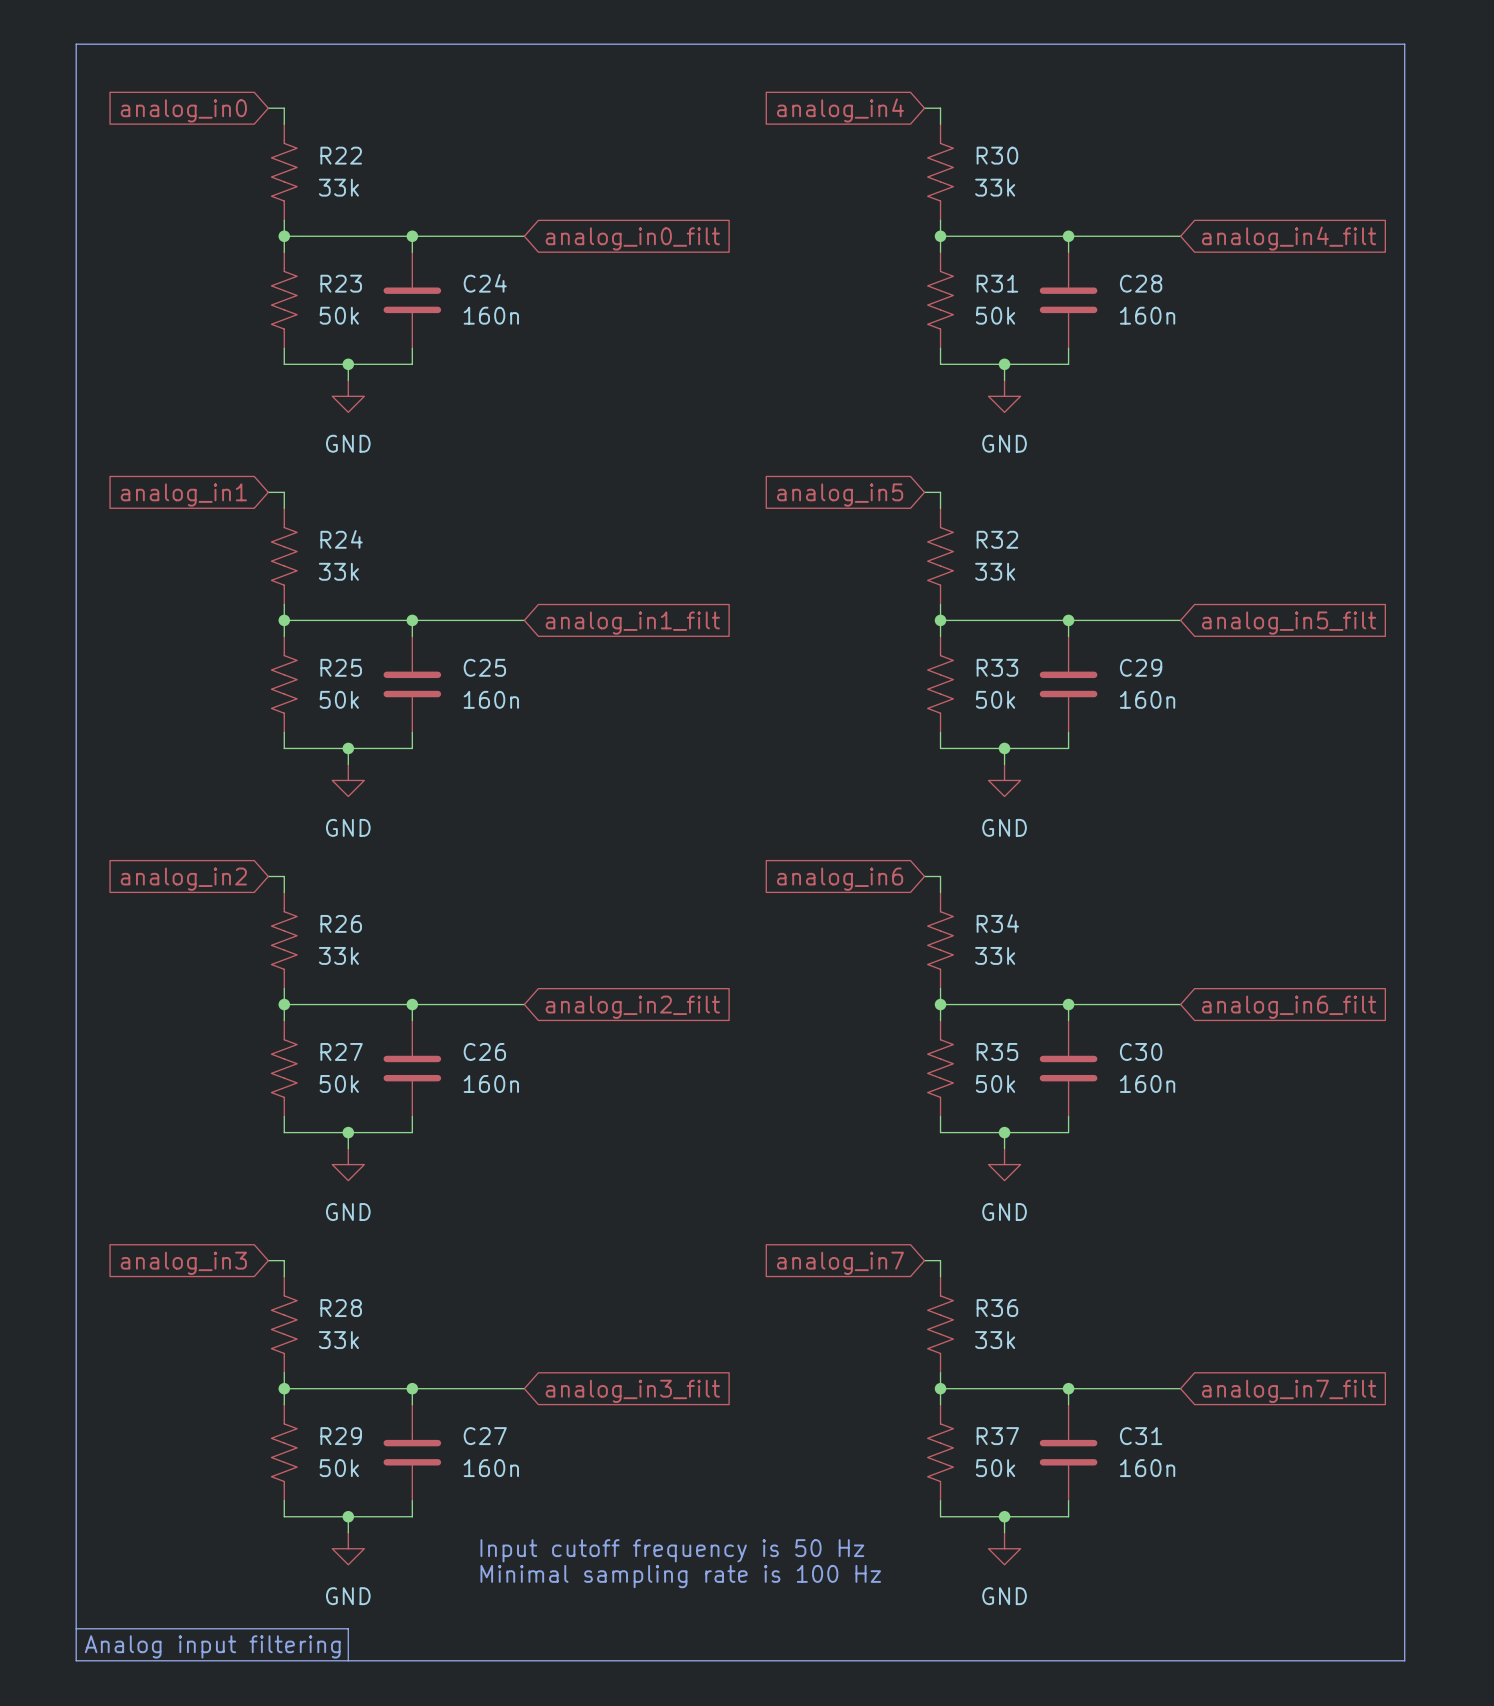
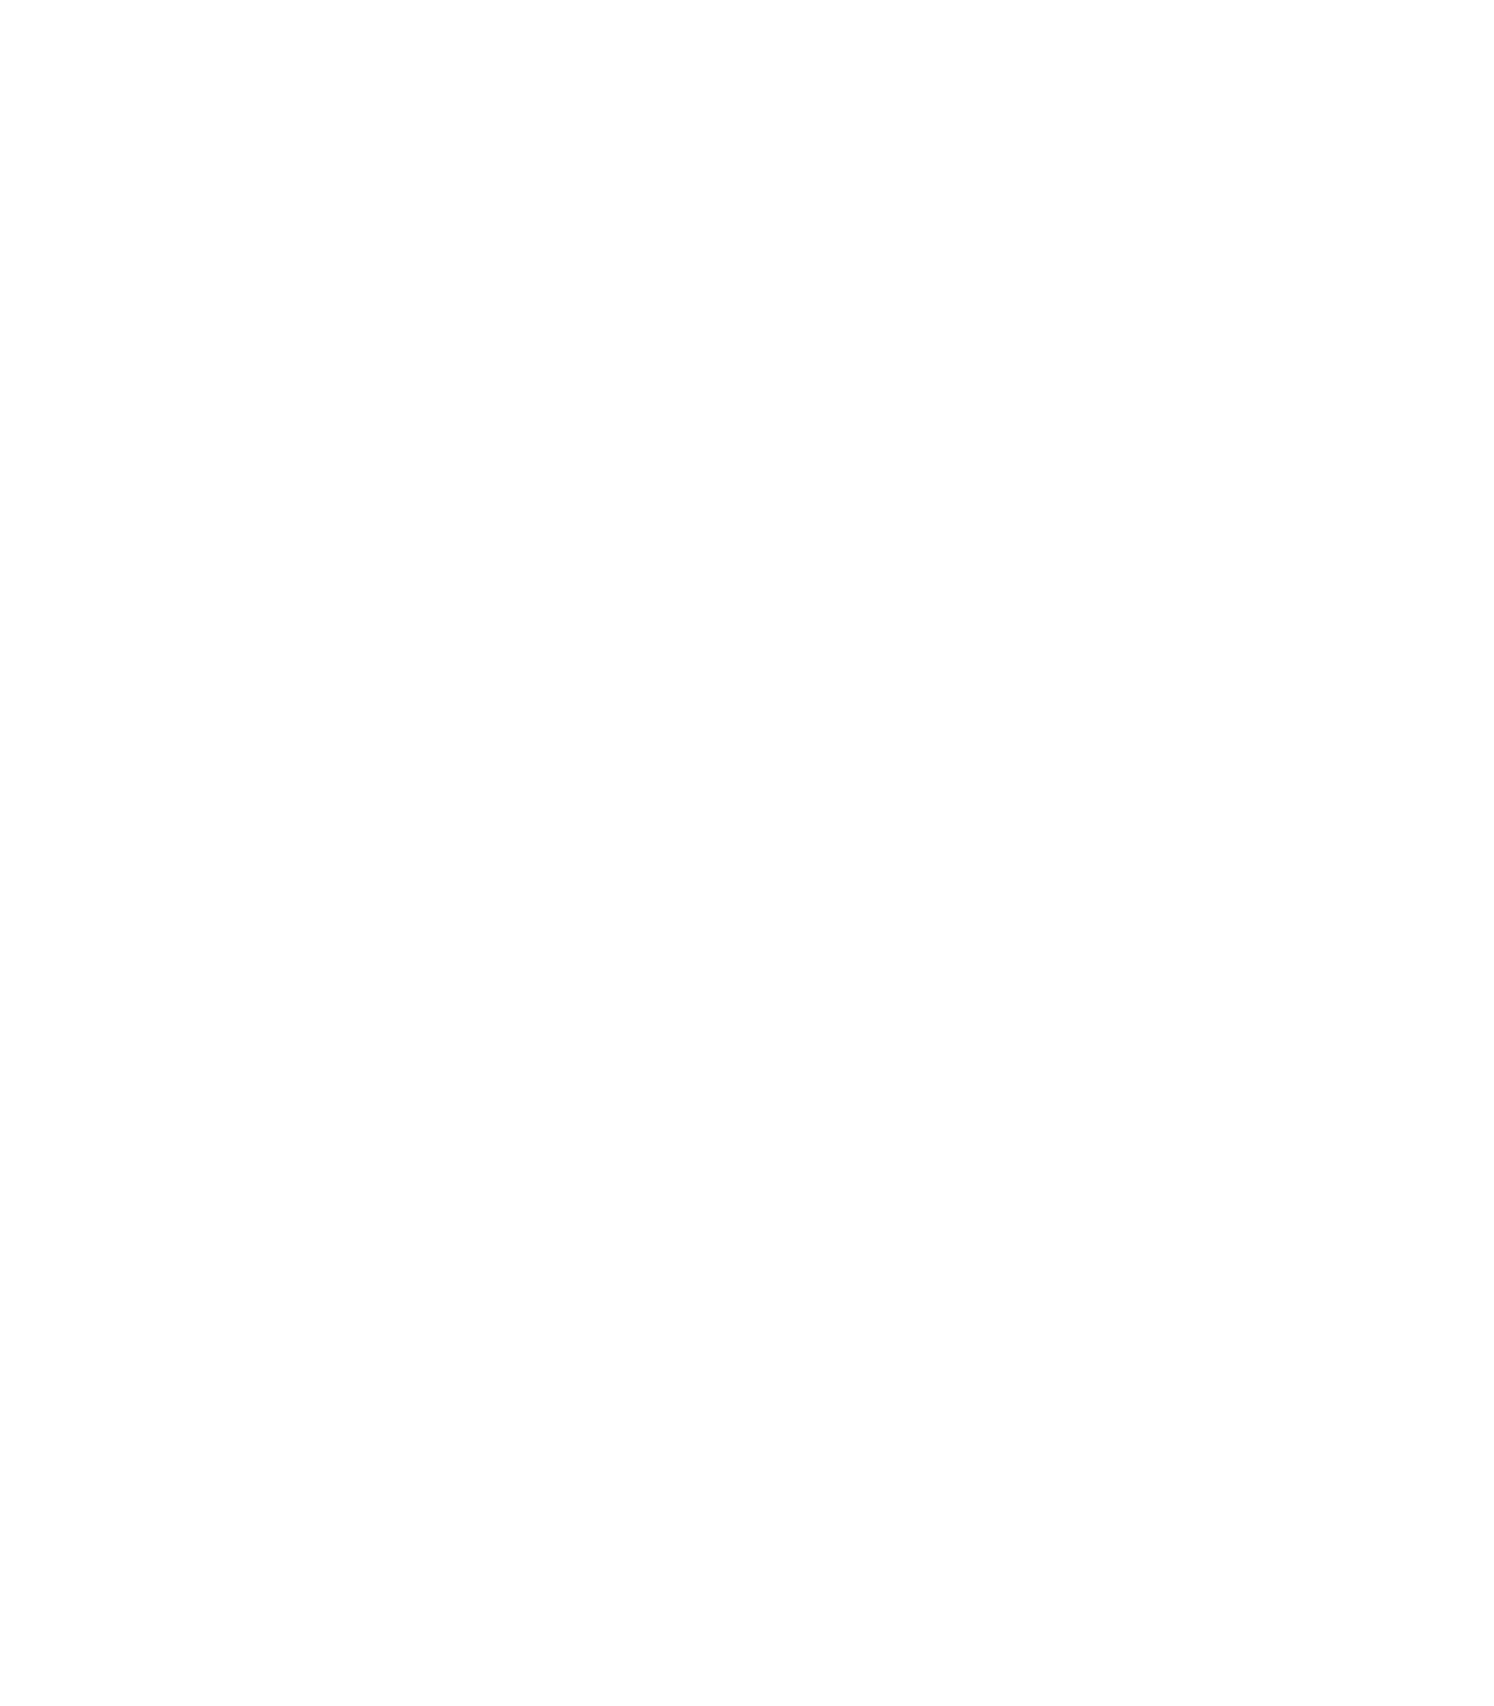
line: (76, 44) (1404, 44) (1404, 1660) (76, 1660) (76, 44) -> none
wire: (268, 108) (284, 108) (284, 124) -> none
wire: (924, 108) (940, 108) (940, 124) -> none
global label: analog_in0 (183, 110) -> none
global label: analog_in4 (840, 110) -> none
R22: 33k (284, 172) -> none
R30: 33k (940, 172) -> none
wire: (284, 220) (284, 252) -> none
wire: (940, 220) (940, 252) -> none
wire: (284, 236) (524, 236) -> none
junction: (284, 236) -> none
wire: (412, 236) (412, 252) -> none
junction: (412, 236) -> none
wire: (940, 236) (1180, 236) -> none
junction: (940, 236) -> none
wire: (1068, 236) (1068, 252) -> none
junction: (1068, 236) -> none
global label: analog_in0_filt (632, 238) -> none
global label: analog_in4_filt (1289, 238) -> none
R23: 50k (284, 300) -> none
C24: 160n (412, 300) -> none
R31: 50k (940, 300) -> none
C28: 160n (1068, 300) -> none
wire: (284, 348) (284, 364) (412, 364) (412, 348) -> none
wire: (940, 348) (940, 364) (1068, 364) (1068, 348) -> none
wire: (348, 364) (348, 380) -> none
junction: (348, 364) -> none
wire: (1004, 364) (1004, 380) -> none
junction: (1004, 364) -> none
power symbol: GND (348, 396) -> none
power symbol: GND (1004, 396) -> none
wire: (268, 492) (284, 492) (284, 508) -> none
wire: (924, 492) (940, 492) (940, 508) -> none
global label: analog_in1 (183, 495) -> none
global label: analog_in5 (840, 495) -> none
R24: 33k (284, 556) -> none
R32: 33k (940, 556) -> none
wire: (284, 604) (284, 636) -> none
wire: (940, 604) (940, 636) -> none
wire: (284, 620) (524, 620) -> none
junction: (284, 620) -> none
wire: (412, 620) (412, 636) -> none
junction: (412, 620) -> none
wire: (940, 620) (1180, 620) -> none
junction: (940, 620) -> none
wire: (1068, 620) (1068, 636) -> none
junction: (1068, 620) -> none
global label: analog_in1_filt (632, 623) -> none
global label: analog_in5_filt (1289, 623) -> none
R25: 50k (284, 684) -> none
C25: 160n (412, 684) -> none
R33: 50k (940, 684) -> none
C29: 160n (1068, 684) -> none
wire: (284, 732) (284, 748) (412, 748) (412, 732) -> none
wire: (940, 732) (940, 748) (1068, 748) (1068, 732) -> none
wire: (348, 748) (348, 764) -> none
junction: (348, 748) -> none
wire: (1004, 748) (1004, 764) -> none
junction: (1004, 748) -> none
power symbol: GND (348, 780) -> none
power symbol: GND (1004, 780) -> none
wire: (268, 876) (284, 876) (284, 892) -> none
wire: (924, 876) (940, 876) (940, 892) -> none
global label: analog_in2 (183, 879) -> none
global label: analog_in6 (840, 879) -> none
R26: 33k (284, 940) -> none
R34: 33k (940, 940) -> none
wire: (284, 988) (284, 1020) -> none
wire: (940, 988) (940, 1020) -> none
wire: (284, 1004) (524, 1004) -> none
junction: (284, 1004) -> none
wire: (412, 1004) (412, 1020) -> none
junction: (412, 1004) -> none
wire: (940, 1004) (1180, 1004) -> none
junction: (940, 1004) -> none
wire: (1068, 1004) (1068, 1020) -> none
junction: (1068, 1004) -> none
global label: analog_in2_filt (632, 1007) -> none
global label: analog_in6_filt (1289, 1007) -> none
R27: 50k (284, 1068) -> none
C26: 160n (412, 1068) -> none
R35: 50k (940, 1068) -> none
C30: 160n (1068, 1068) -> none
wire: (284, 1116) (284, 1132) (412, 1132) (412, 1116) -> none
wire: (940, 1116) (940, 1132) (1068, 1132) (1068, 1116) -> none
wire: (348, 1132) (348, 1148) -> none
junction: (348, 1132) -> none
wire: (1004, 1132) (1004, 1148) -> none
junction: (1004, 1132) -> none
power symbol: GND (348, 1164) -> none
power symbol: GND (1004, 1164) -> none
wire: (268, 1260) (284, 1260) (284, 1276) -> none
wire: (924, 1260) (940, 1260) (940, 1276) -> none
global label: analog_in3 (183, 1263) -> none
global label: analog_in7 (840, 1263) -> none
R28: 33k (284, 1324) -> none
R36: 33k (940, 1324) -> none
wire: (284, 1372) (284, 1404) -> none
wire: (940, 1372) (940, 1404) -> none
wire: (284, 1388) (524, 1388) -> none
junction: (284, 1388) -> none
wire: (412, 1388) (412, 1404) -> none
junction: (412, 1388) -> none
wire: (940, 1388) (1180, 1388) -> none
junction: (940, 1388) -> none
wire: (1068, 1388) (1068, 1404) -> none
junction: (1068, 1388) -> none
global label: analog_in3_filt (632, 1391) -> none
global label: analog_in7_filt (1289, 1391) -> none
R29: 50k (284, 1452) -> none
C27: 160n (412, 1452) -> none
R37: 50k (940, 1452) -> none
C31: 160n (1068, 1452) -> none
wire: (284, 1500) (284, 1516) (412, 1516) (412, 1500) -> none
wire: (940, 1500) (940, 1516) (1068, 1516) (1068, 1500) -> none
wire: (348, 1516) (348, 1532) -> none
junction: (348, 1516) -> none
wire: (1004, 1516) (1004, 1532) -> none
junction: (1004, 1516) -> none
power symbol: GND (348, 1548) -> none
power symbol: GND (1004, 1548) -> none
text: Input cutoff frequency is 50 Hz (672, 1550) -> none
text: Minimal sampling rate is 100 Hz (680, 1576) -> none
line: (76, 1628) (348, 1628) (348, 1660) -> none
text: Analog input filtering (212, 1646) -> none

